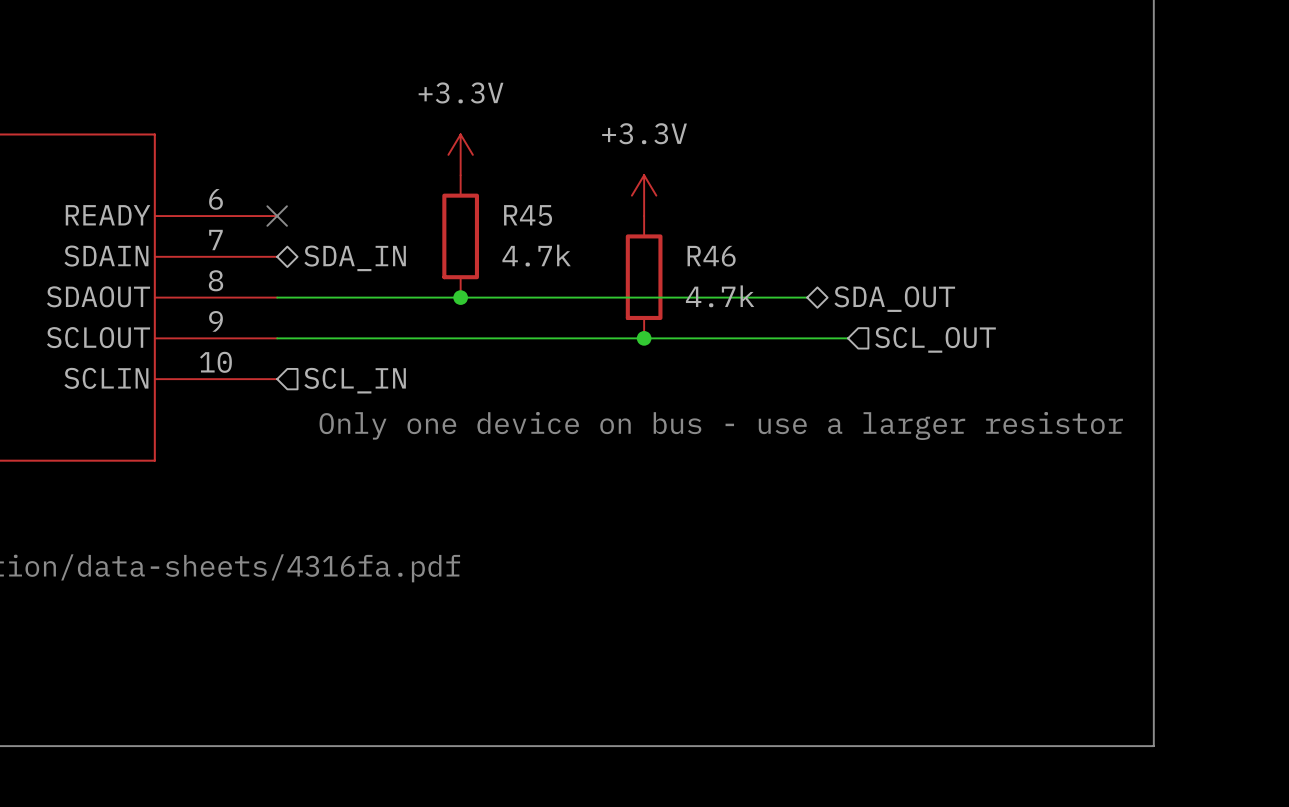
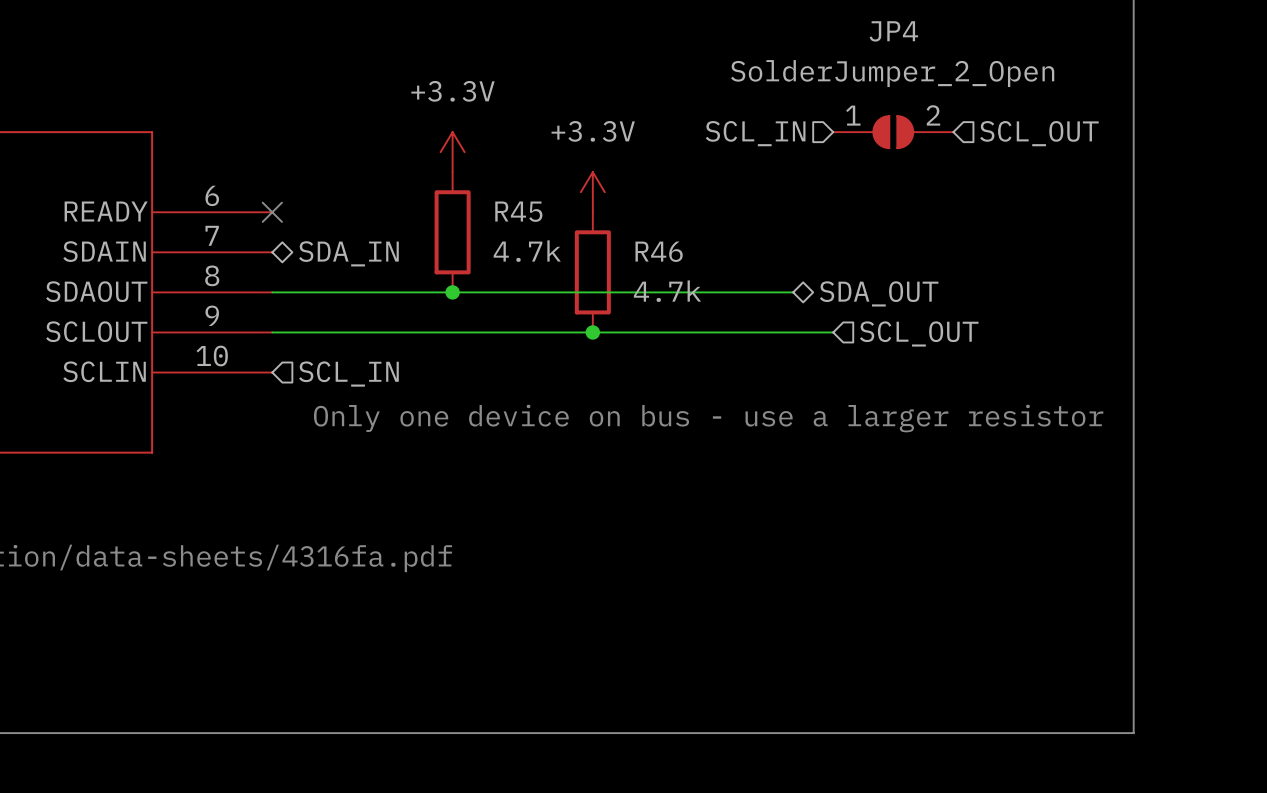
JP4: none -> SolderJumper_2_Open (893, 132)
hierarchical label: none -> SCL_IN (755, 133)
hierarchical label: none -> SCL_OUT (1039, 133)
power symbol position: +3.3V (644, 195) -> +3.3V (592, 192)
R46 position: (644, 277) -> (592, 272)
junction position: (644, 338) -> (592, 332)

